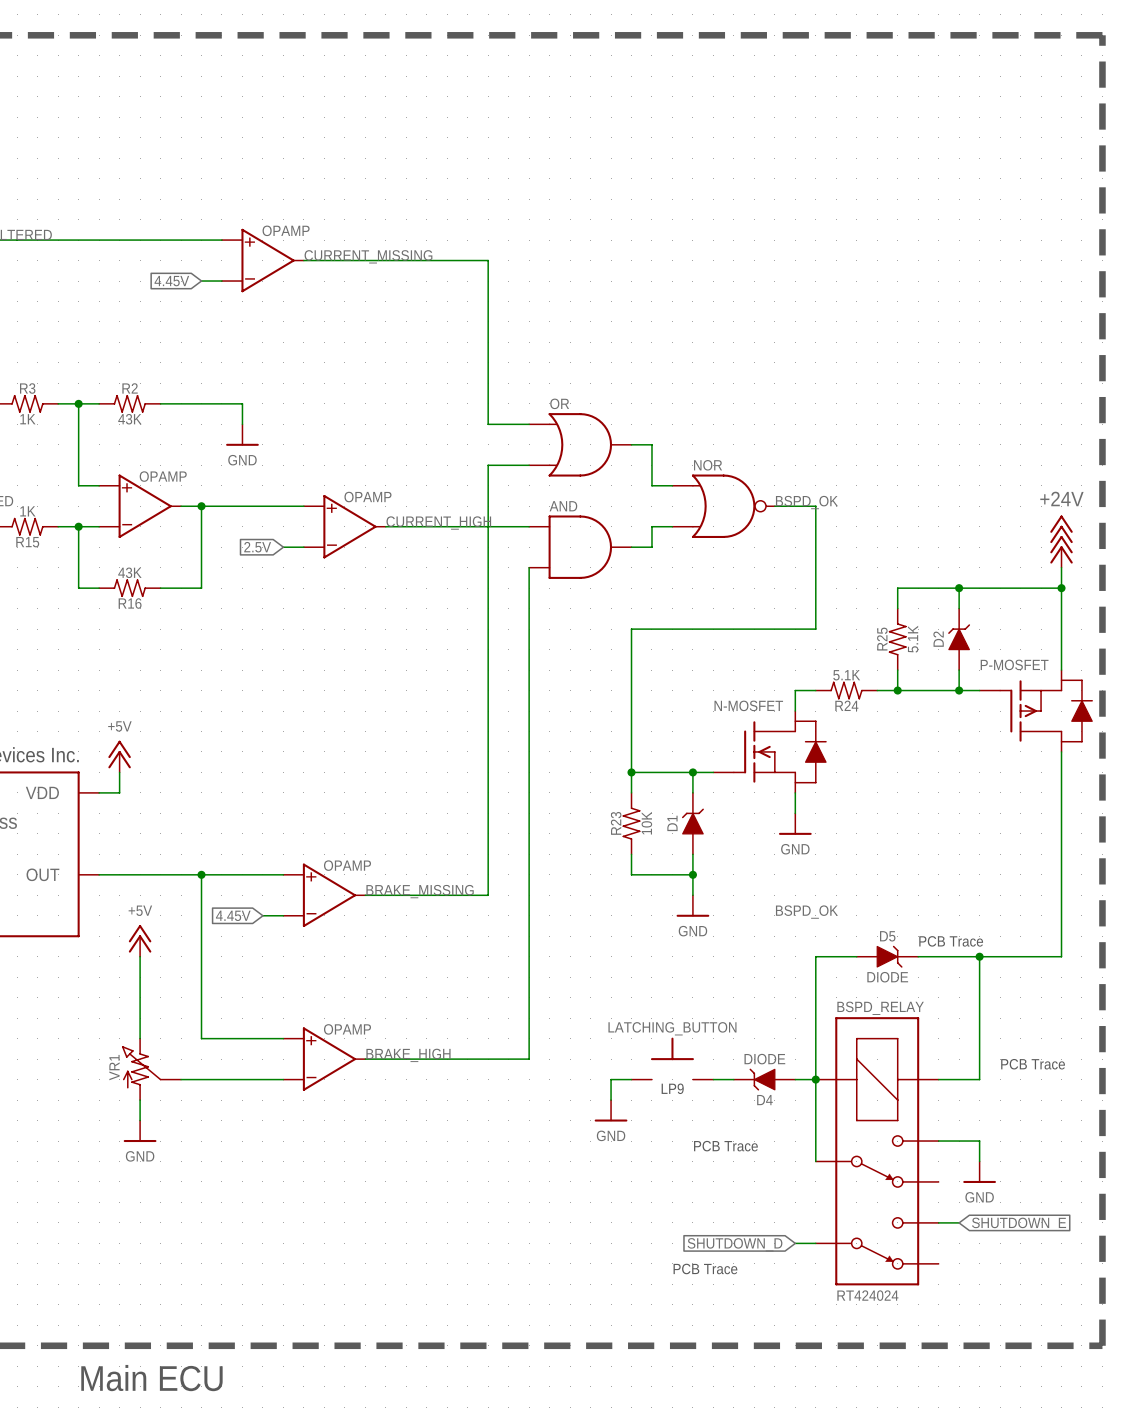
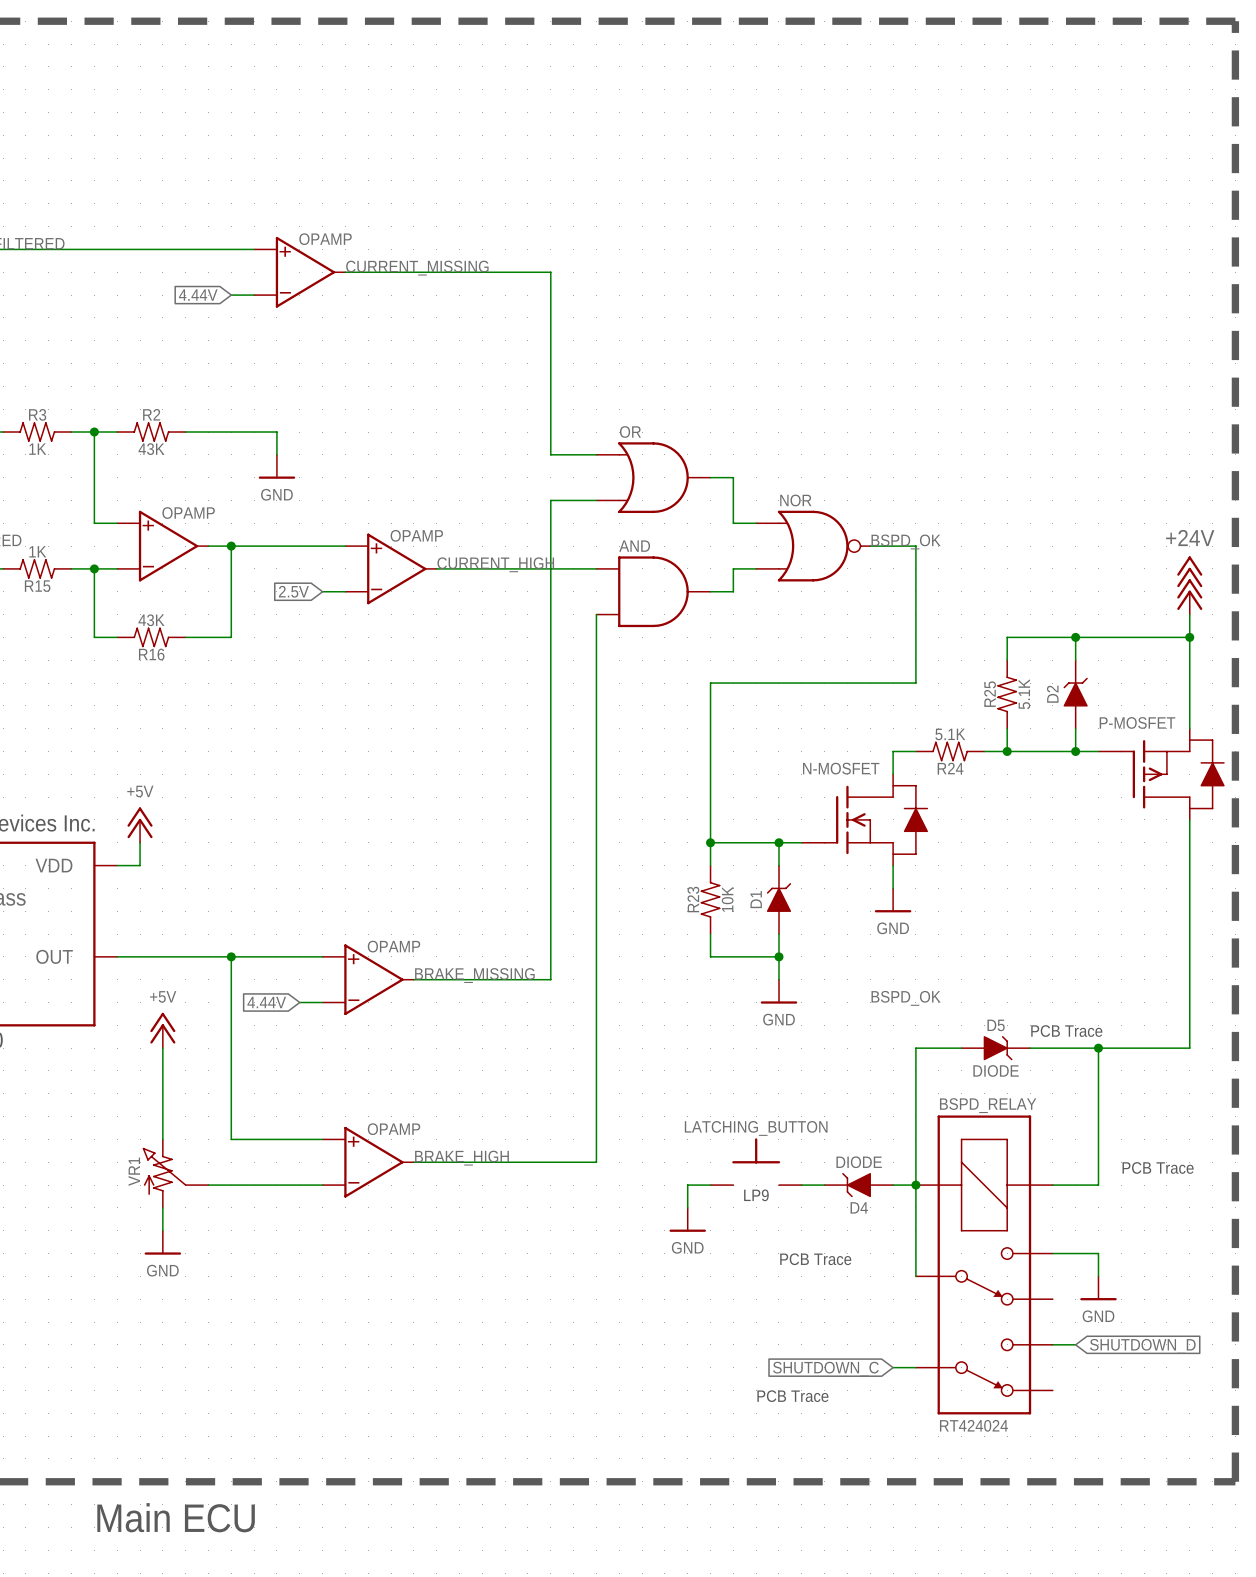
global label: 4.45V (171, 281) -> 4.44V (198, 295)
global label: 4.45V (233, 915) -> 4.44V (266, 1002)
global label: SHUTDOWN_E (1019, 1224) -> SHUTDOWN_D (1142, 1346)
global label: SHUTDOWN_D (735, 1244) -> SHUTDOWN_C (825, 1369)

